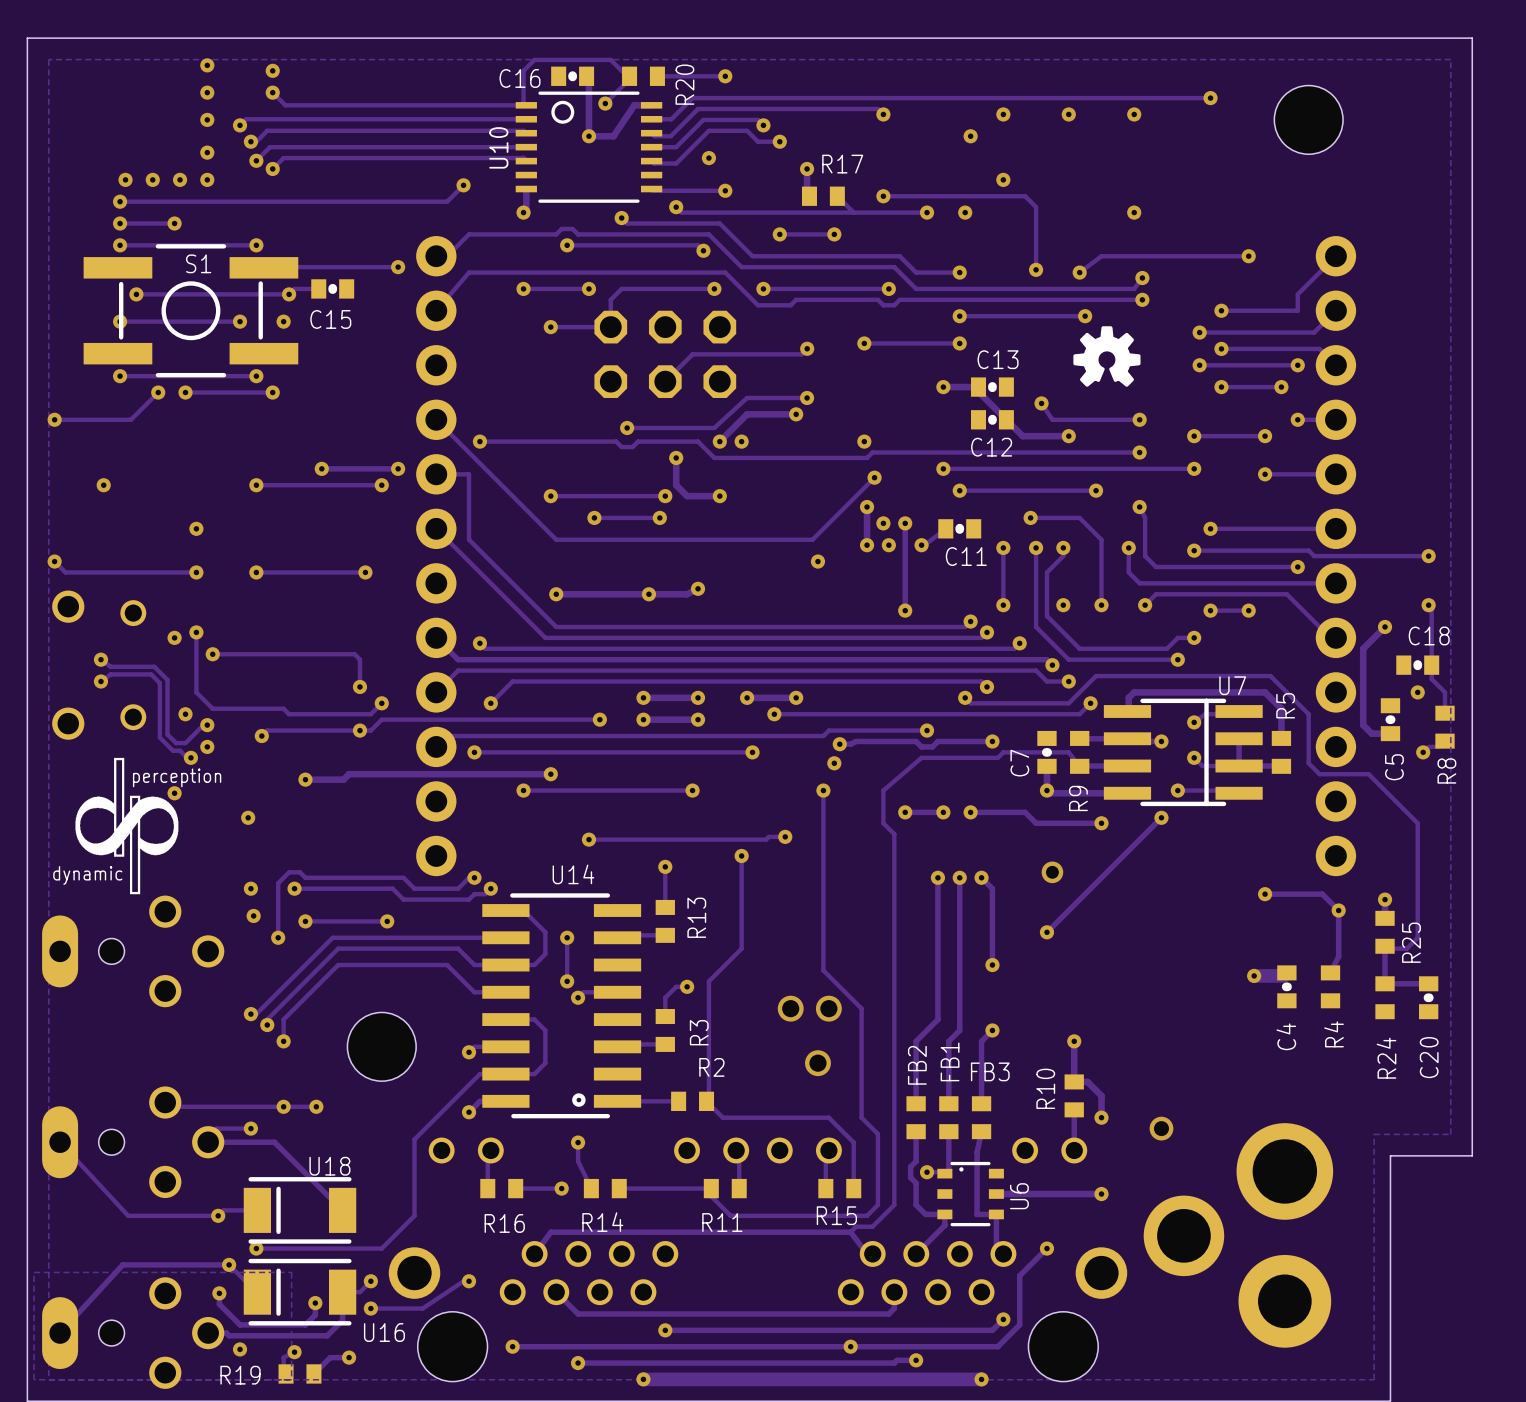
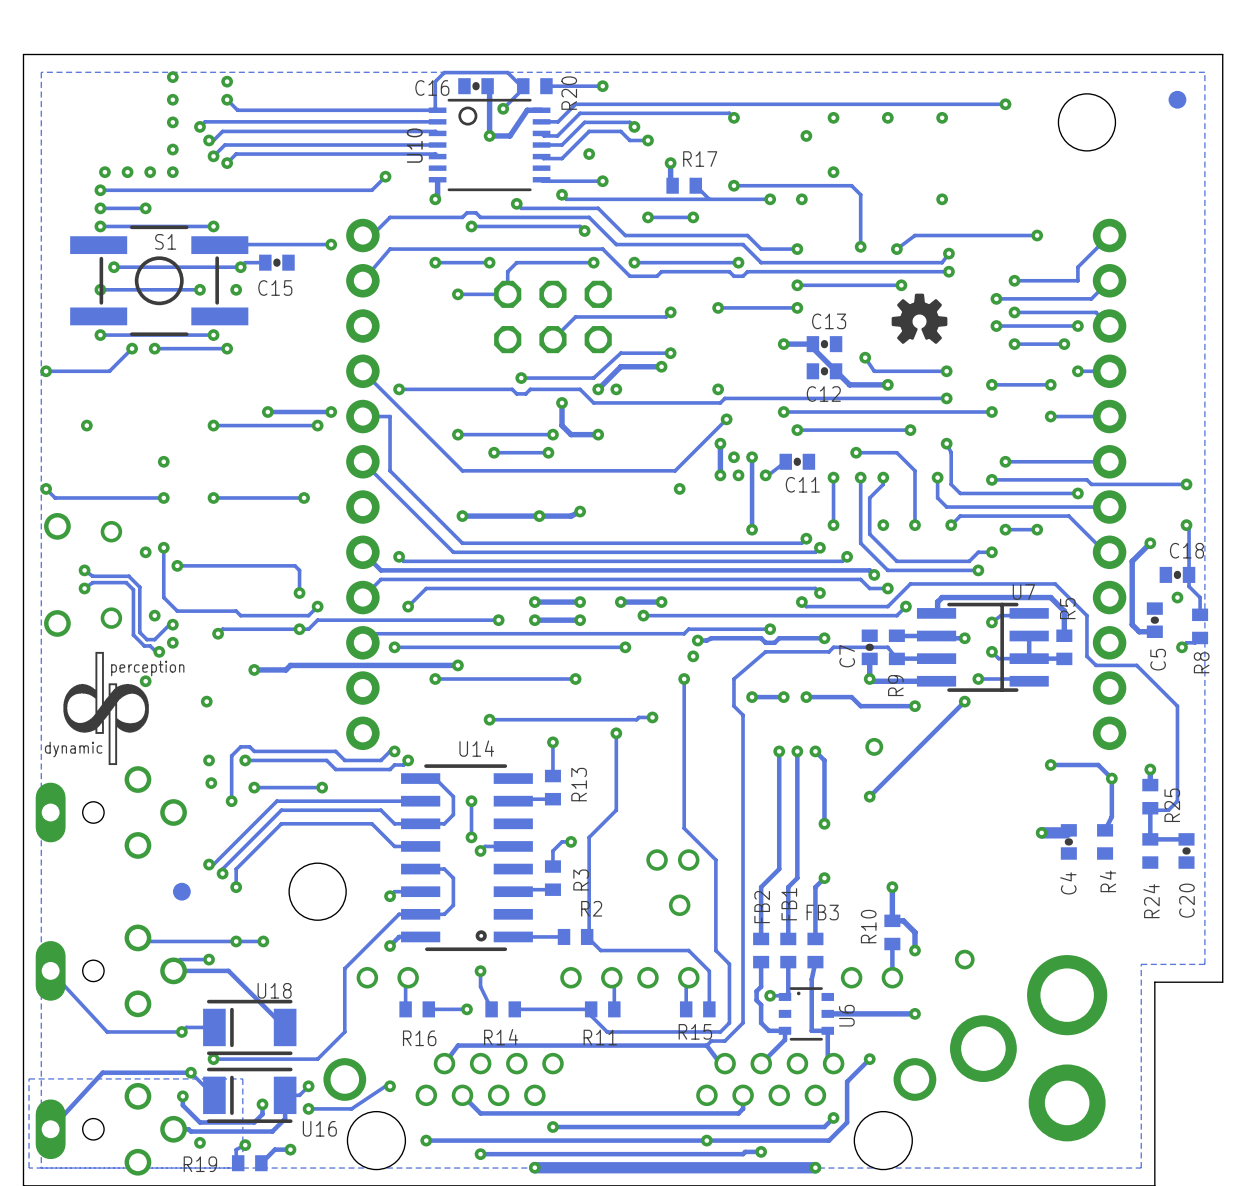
part: none -> (1177, 99)
part: none -> (181, 891)

